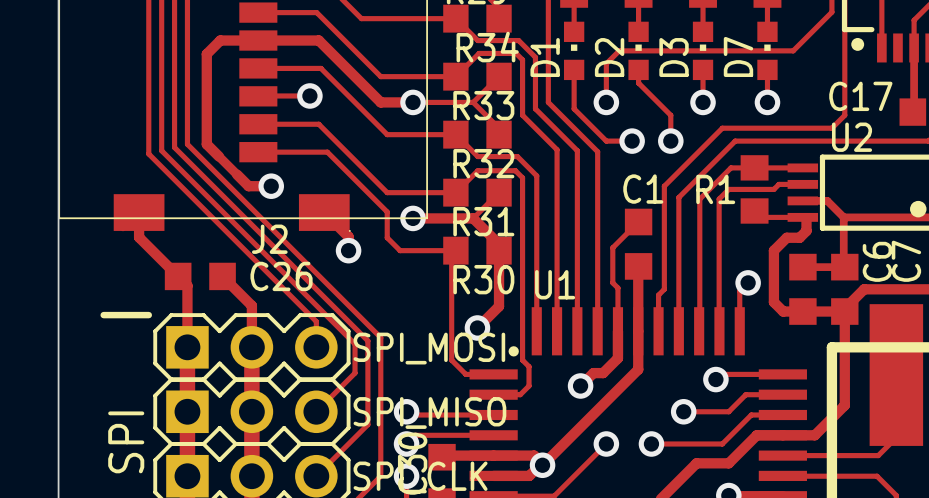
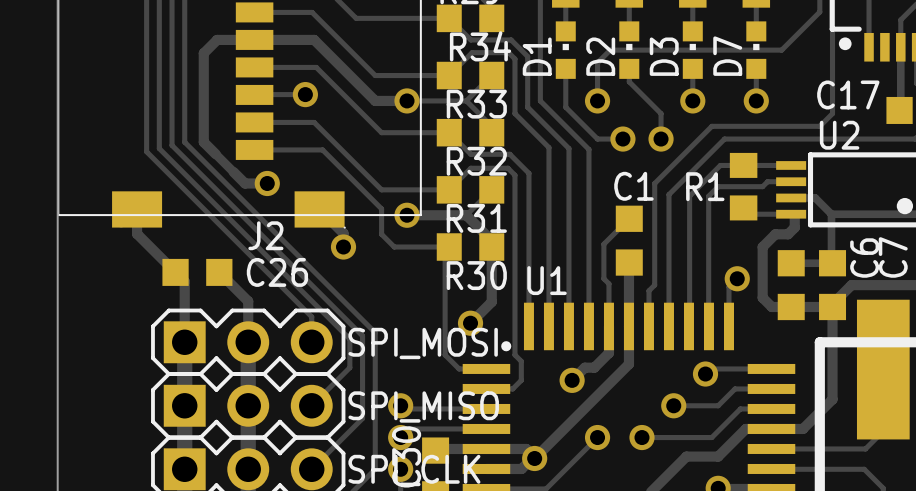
line: (103, 315) (148, 315) -> none
text: SPI (126, 442) -> none

